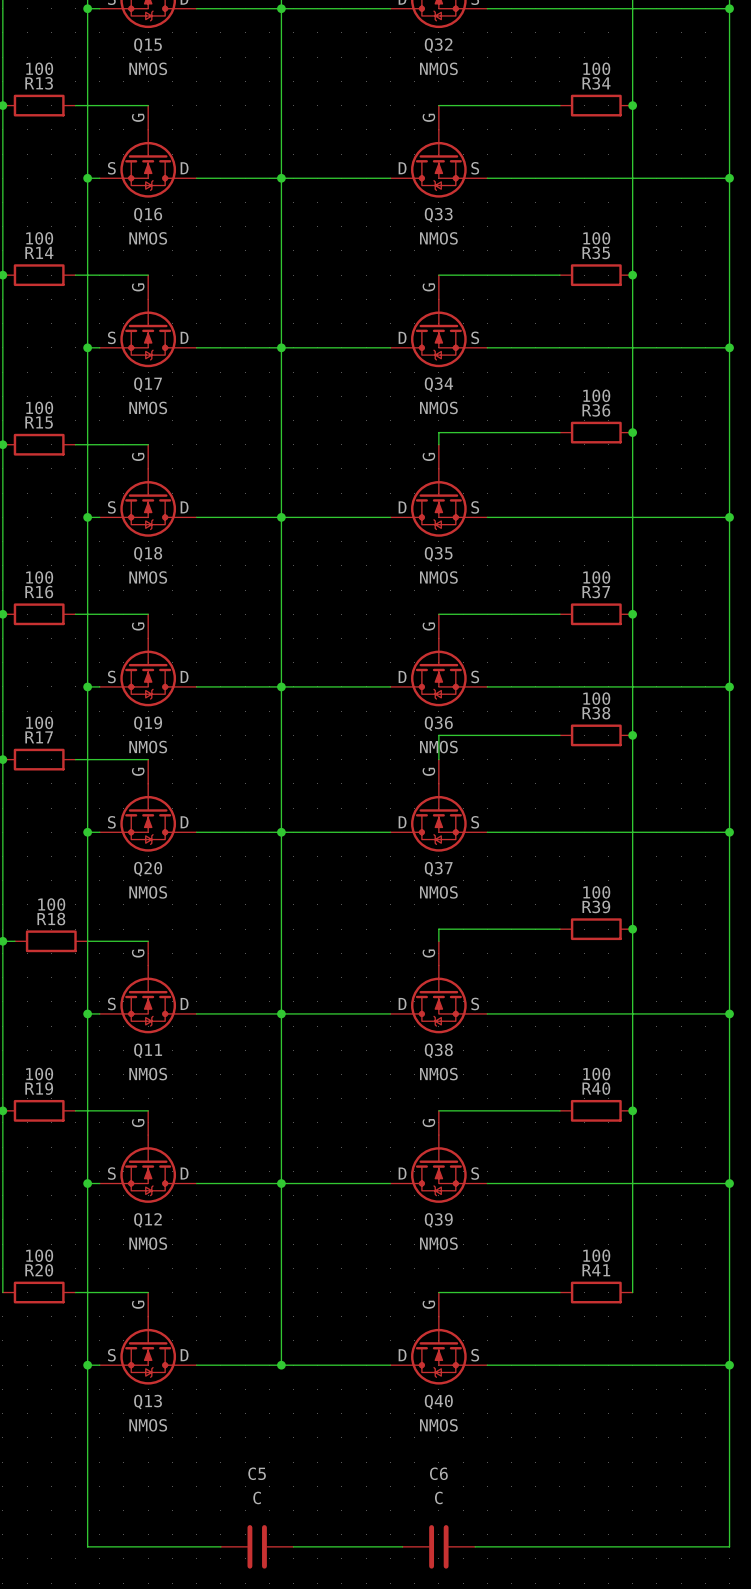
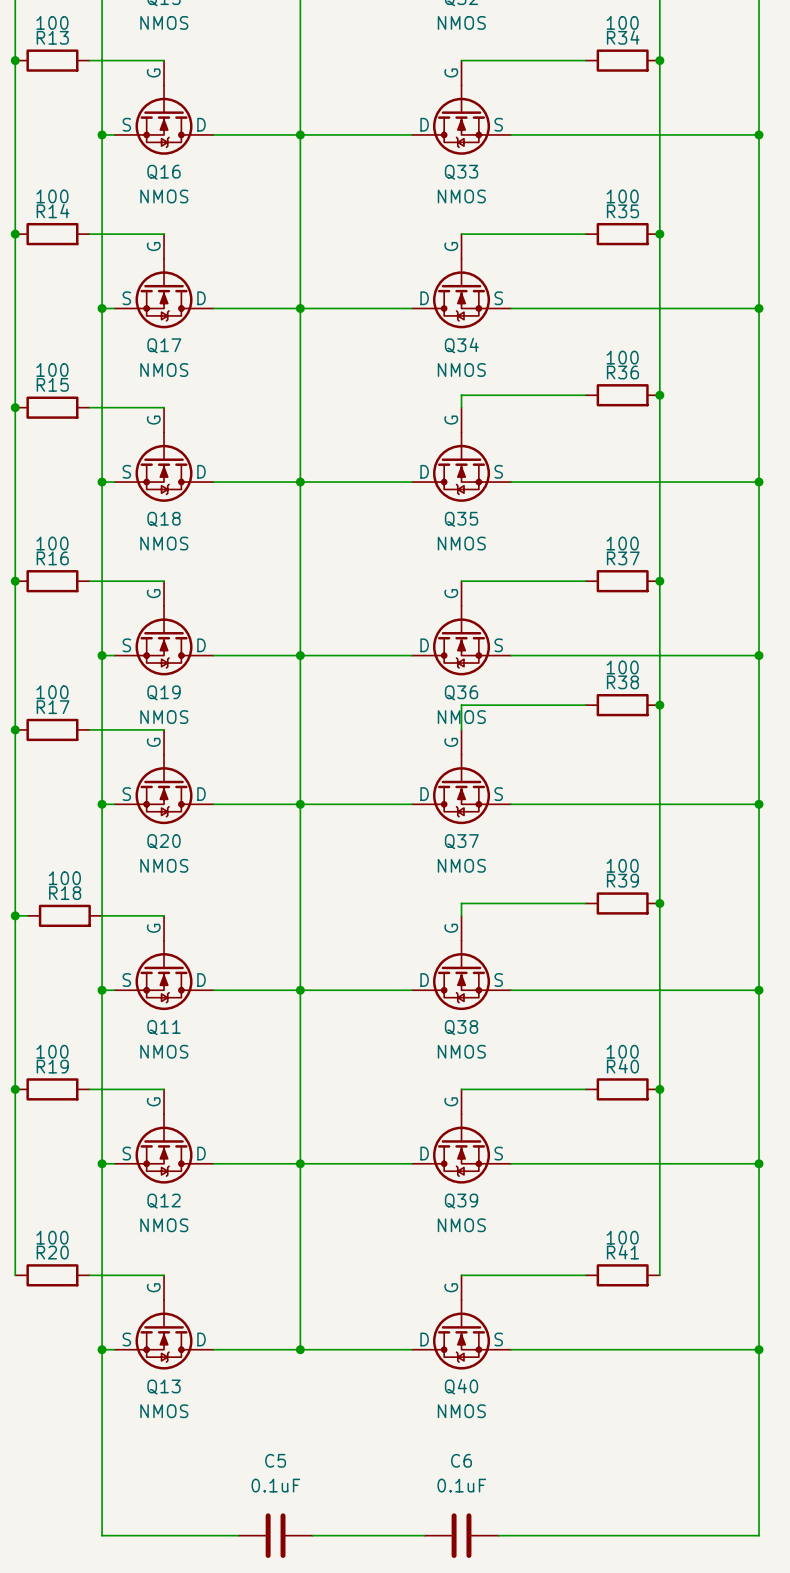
C5 value: C (257, 1497) -> 0.1uF (275, 1485)
C6 value: C (438, 1497) -> 0.1uF (461, 1485)

